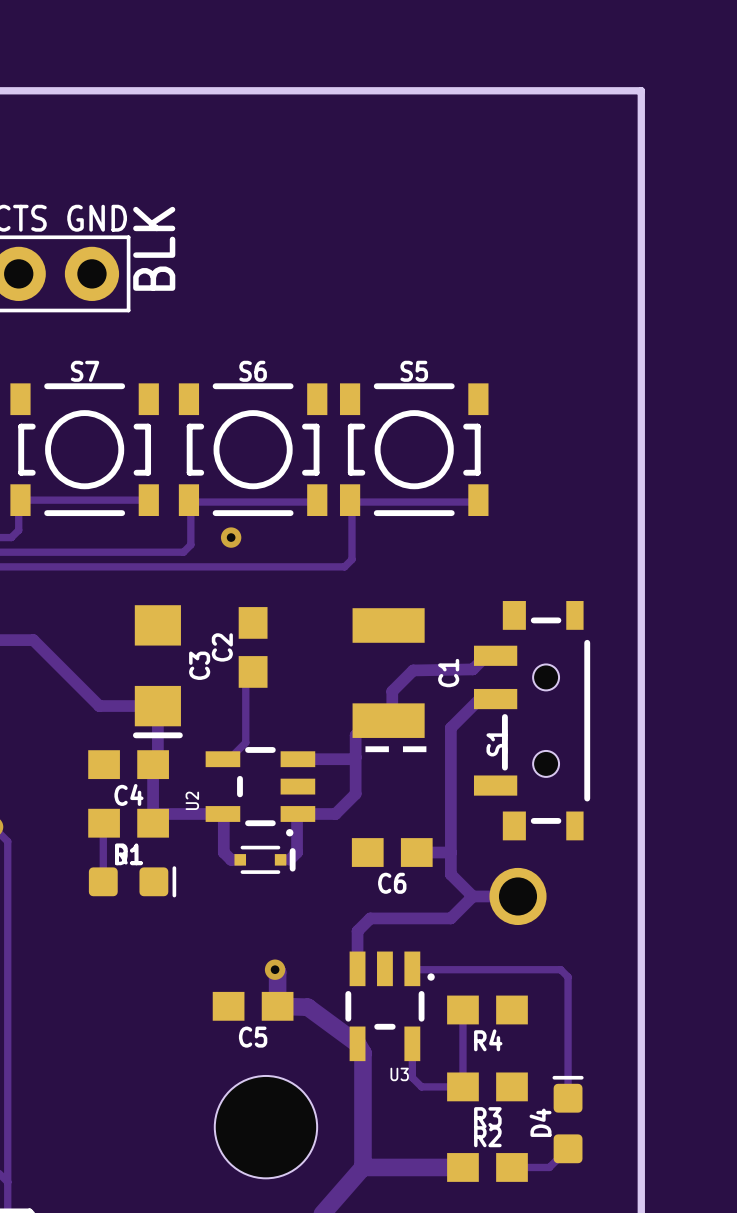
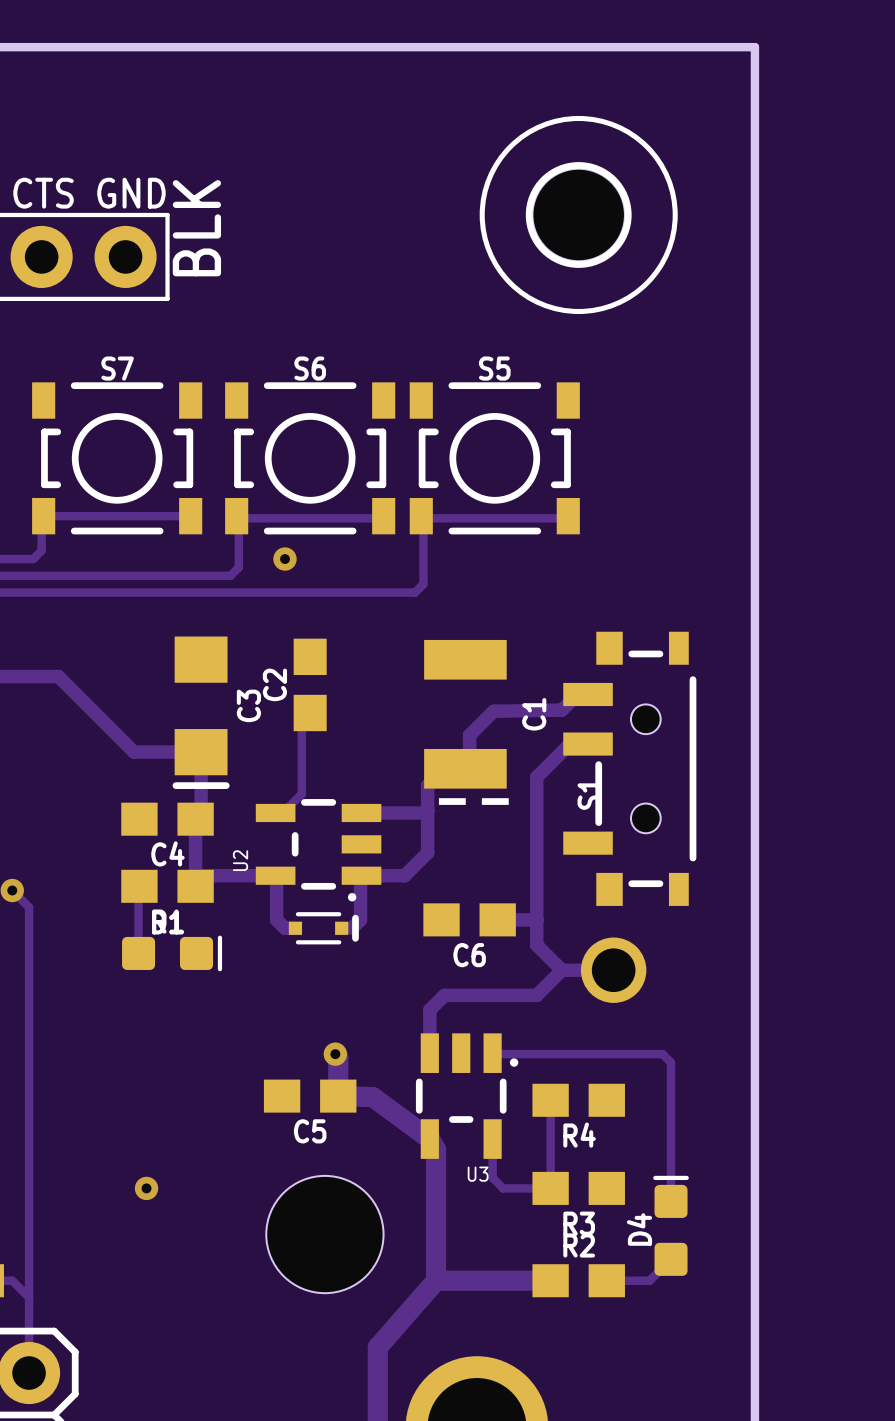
part: none -> (578, 214)
via: none -> (146, 1188)

